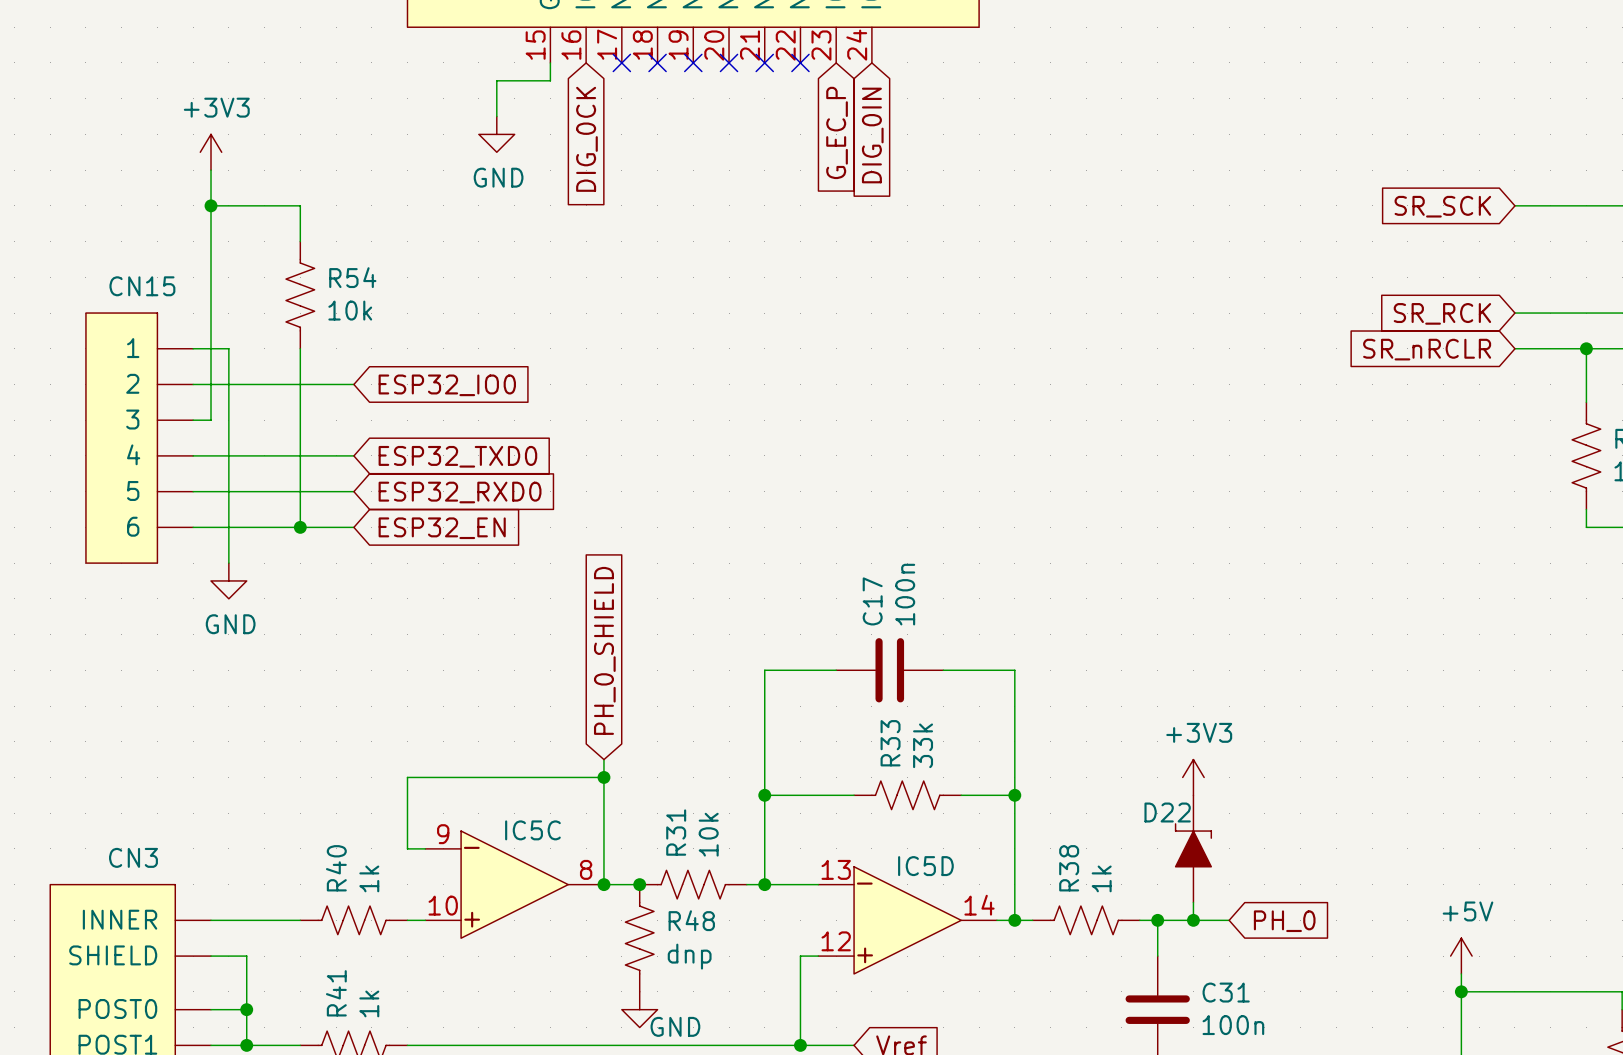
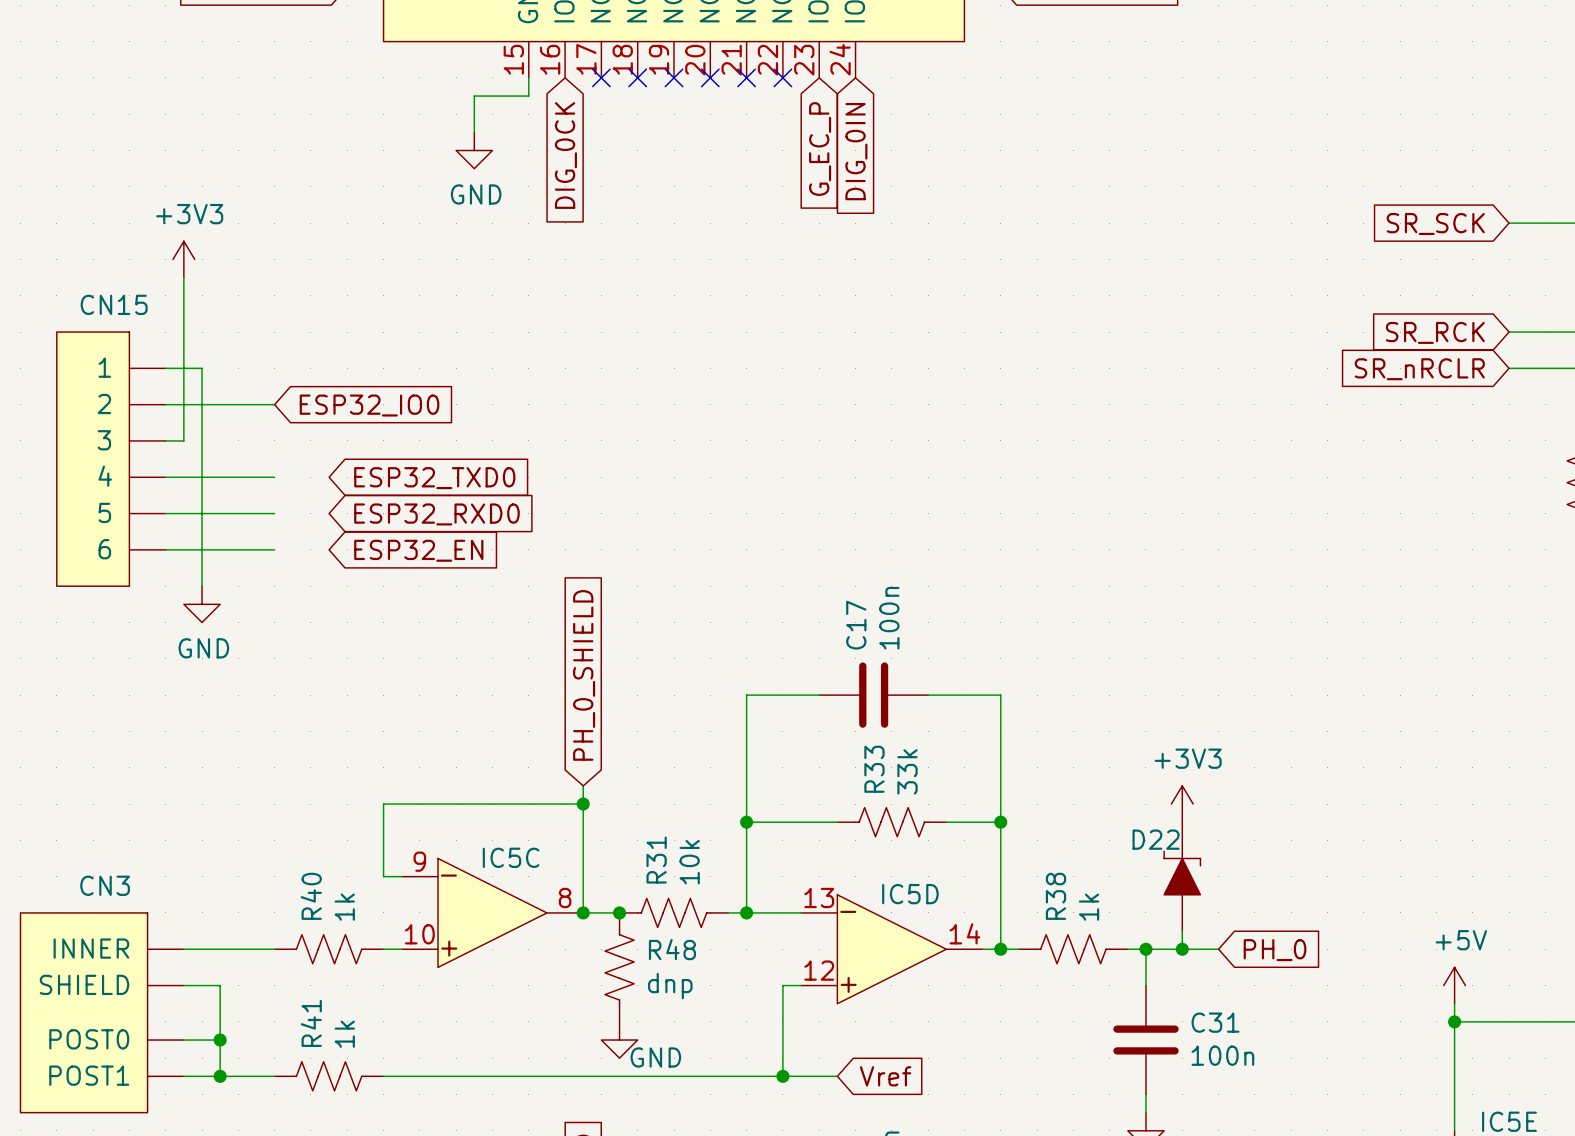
power symbol position: +3V3 (211, 152) -> +3V3 (183, 259)
wire: (211, 170) (211, 259) -> none
wire: (211, 205) (300, 205) (300, 241) -> none
junction: (211, 205) -> none
R54: 10k (300, 295) -> none
wire: (300, 348) (300, 527) (353, 527) -> none
wire: (300, 384) (353, 384) -> none
global label position: ESP32_IO0 (447, 385) -> ESP32_IO0 (369, 405)
wire: (300, 455) (353, 455) -> none
wire: (300, 491) (353, 491) -> none
junction: (300, 527) -> none

